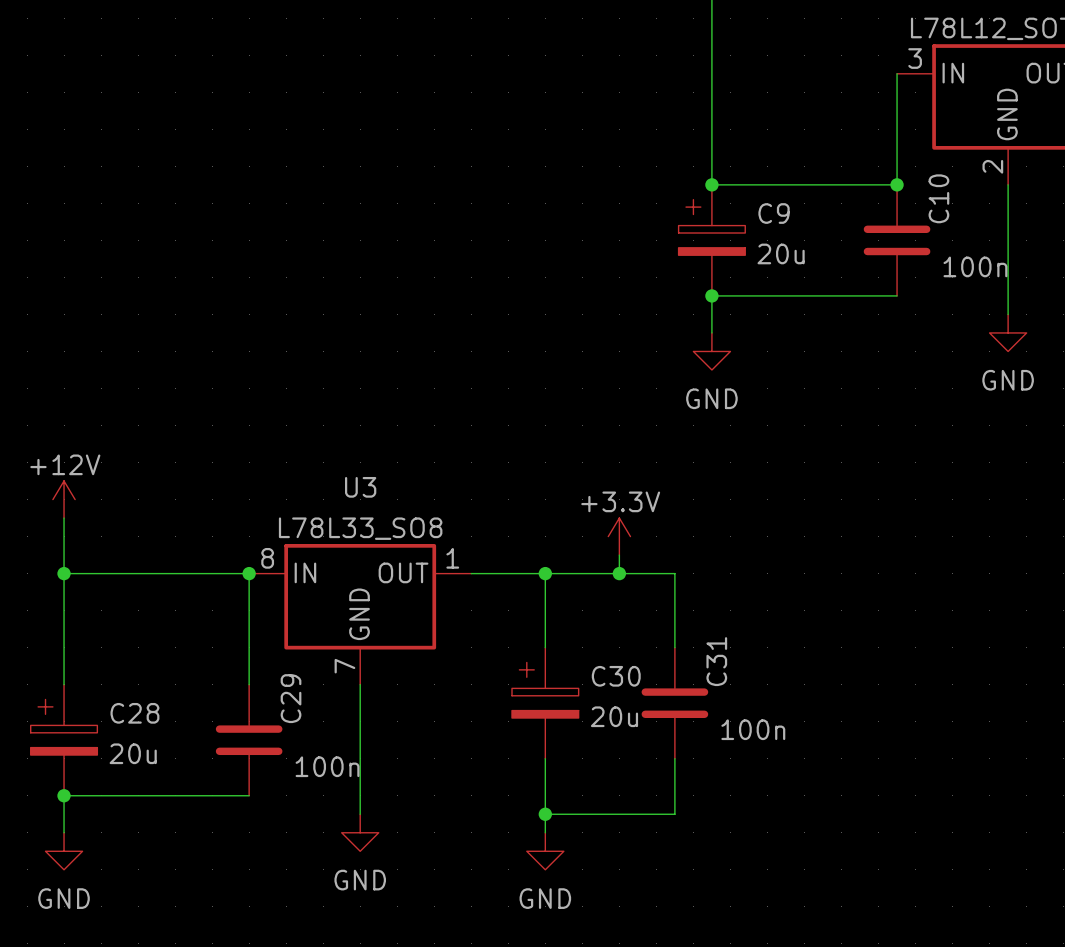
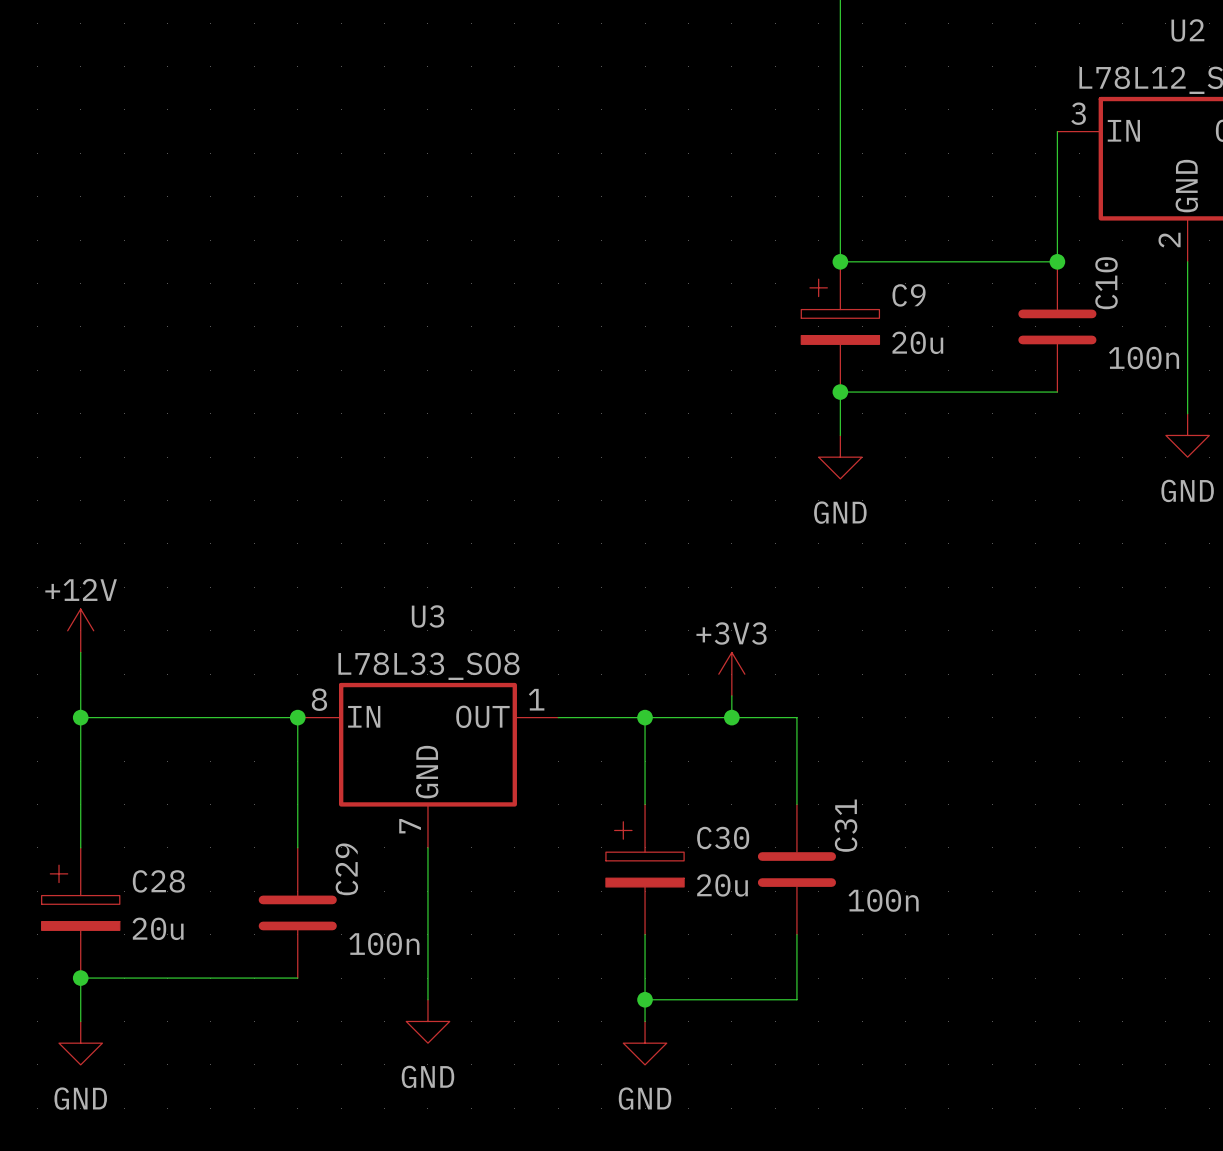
power symbol: +3.3V (619, 536) -> +3V3 (731, 674)

